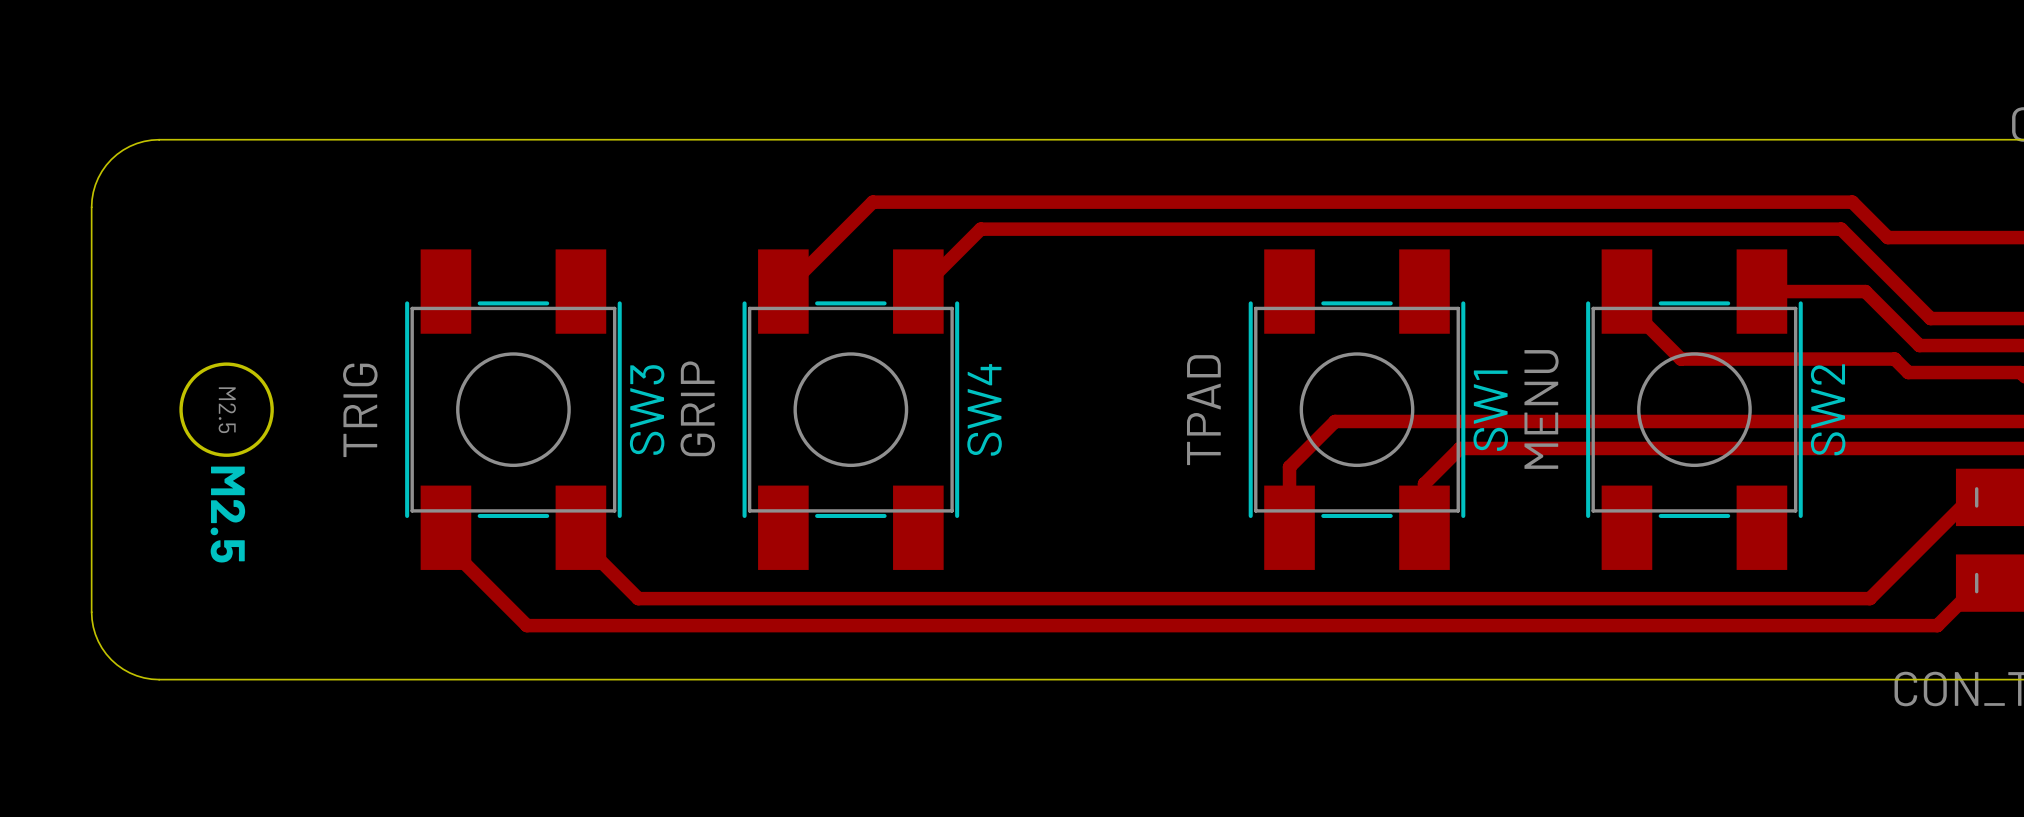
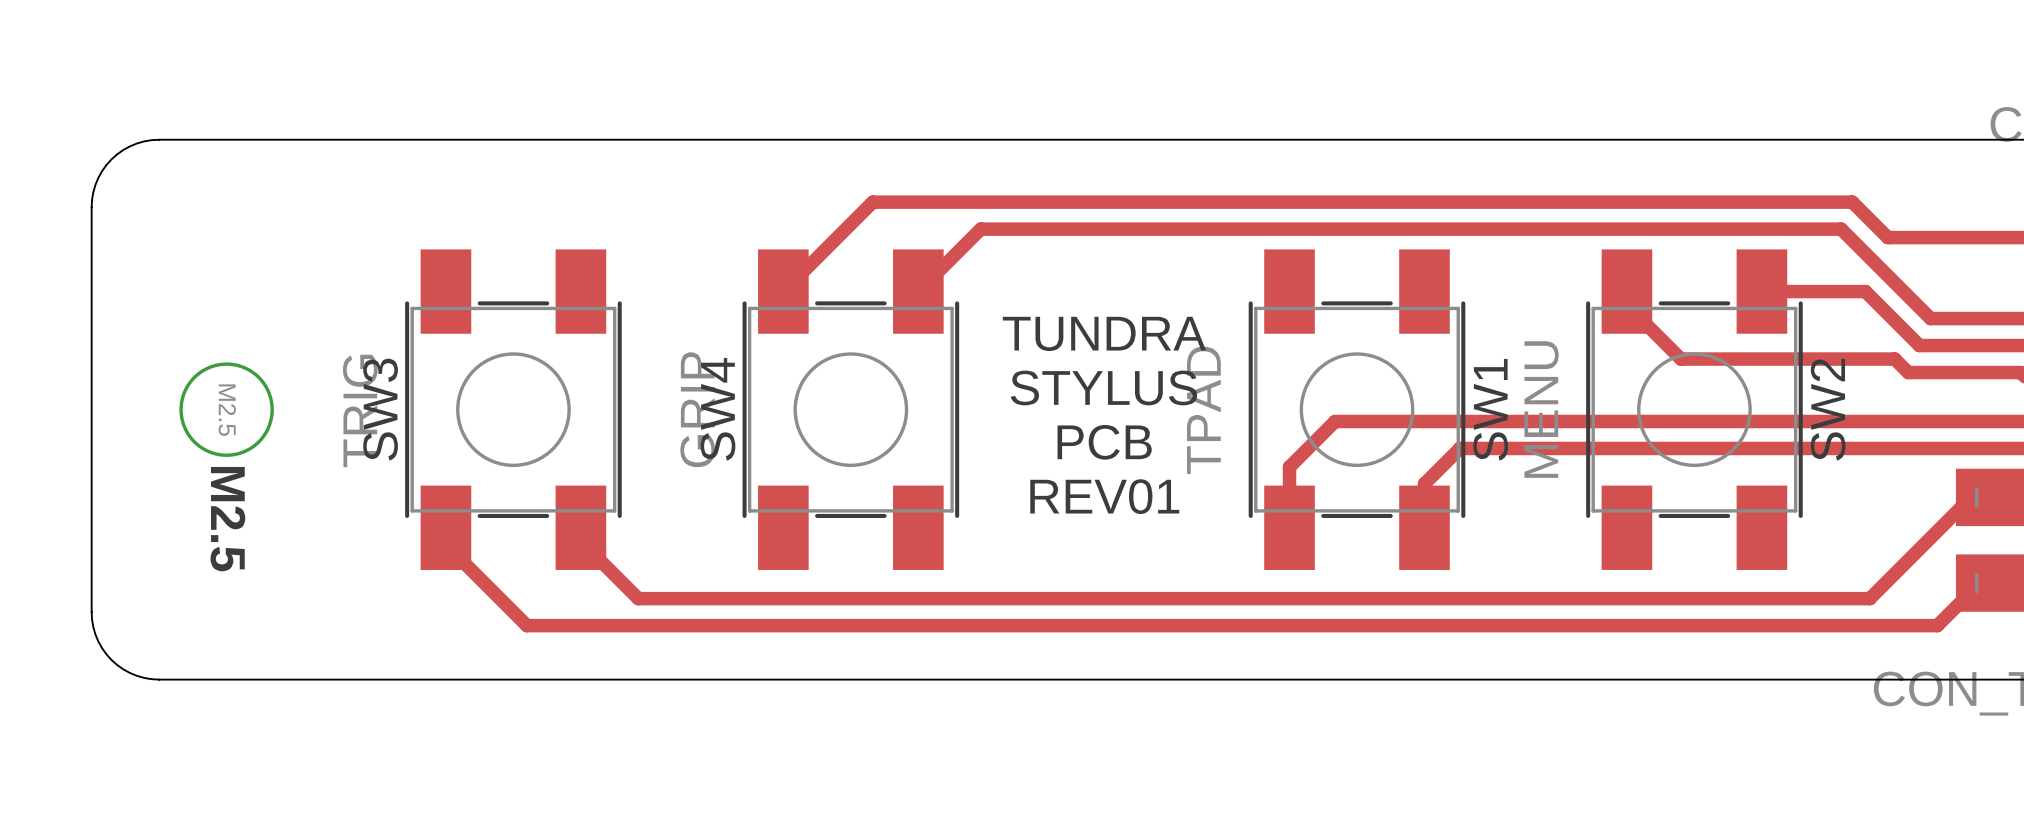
text: none -> TUNDRA (1104, 333)
text: none -> STYLUS (1103, 387)
SW3 name position: SW3 (647, 409) -> SW3 (380, 409)
SW4 name position: SW4 (984, 409) -> SW4 (717, 409)
text: none -> PCB (1104, 442)
text: none -> REV01 (1104, 496)

